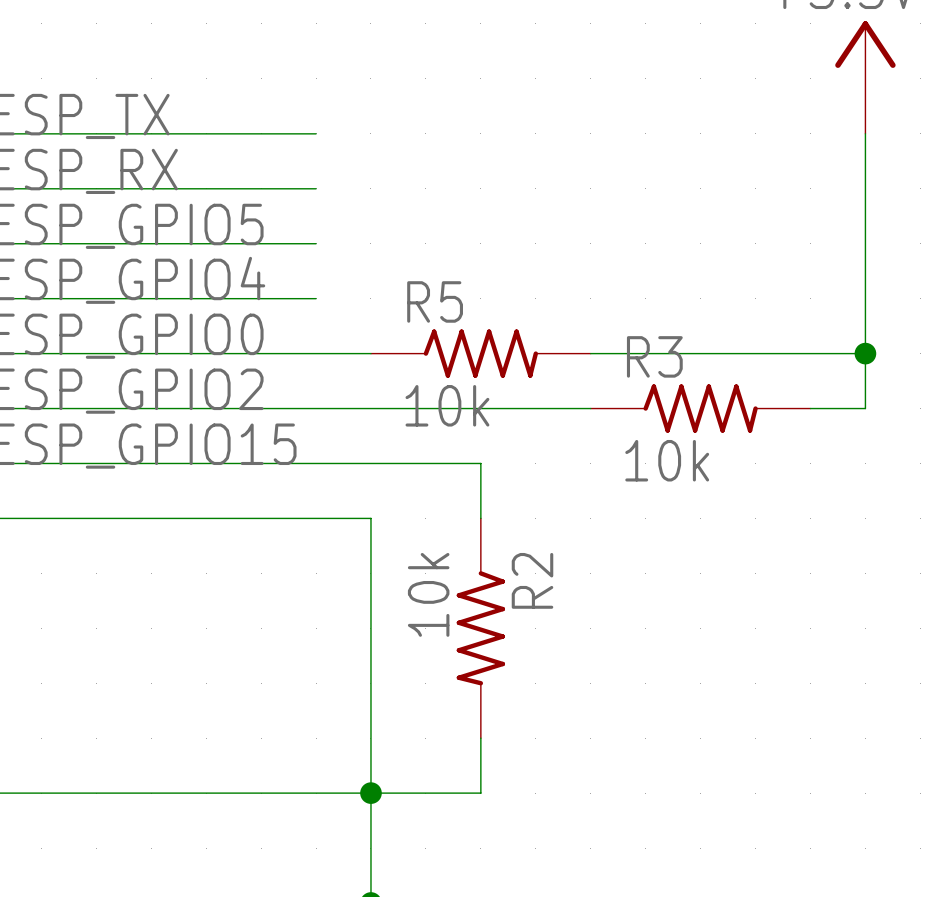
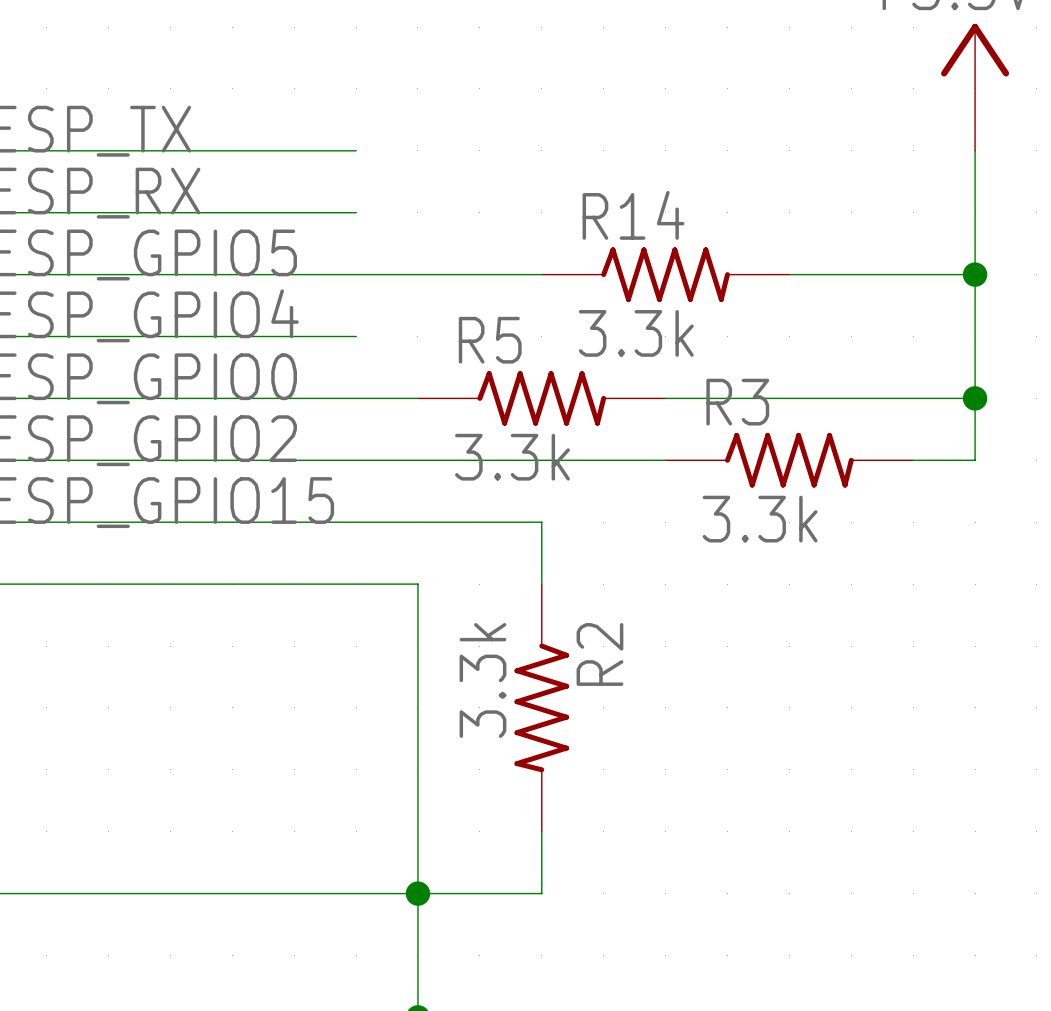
wire: none -> (356, 274) (541, 274)
R14: none -> 3.3k (665, 274)
wire: none -> (789, 274) (975, 274)
junction: none -> (975, 274)
R5 value: 10k (447, 405) -> 3.3k (512, 457)
R3 value: 10k (667, 460) -> 3.3k (760, 519)
R2 value: 10k (428, 594) -> 3.3k (482, 680)

